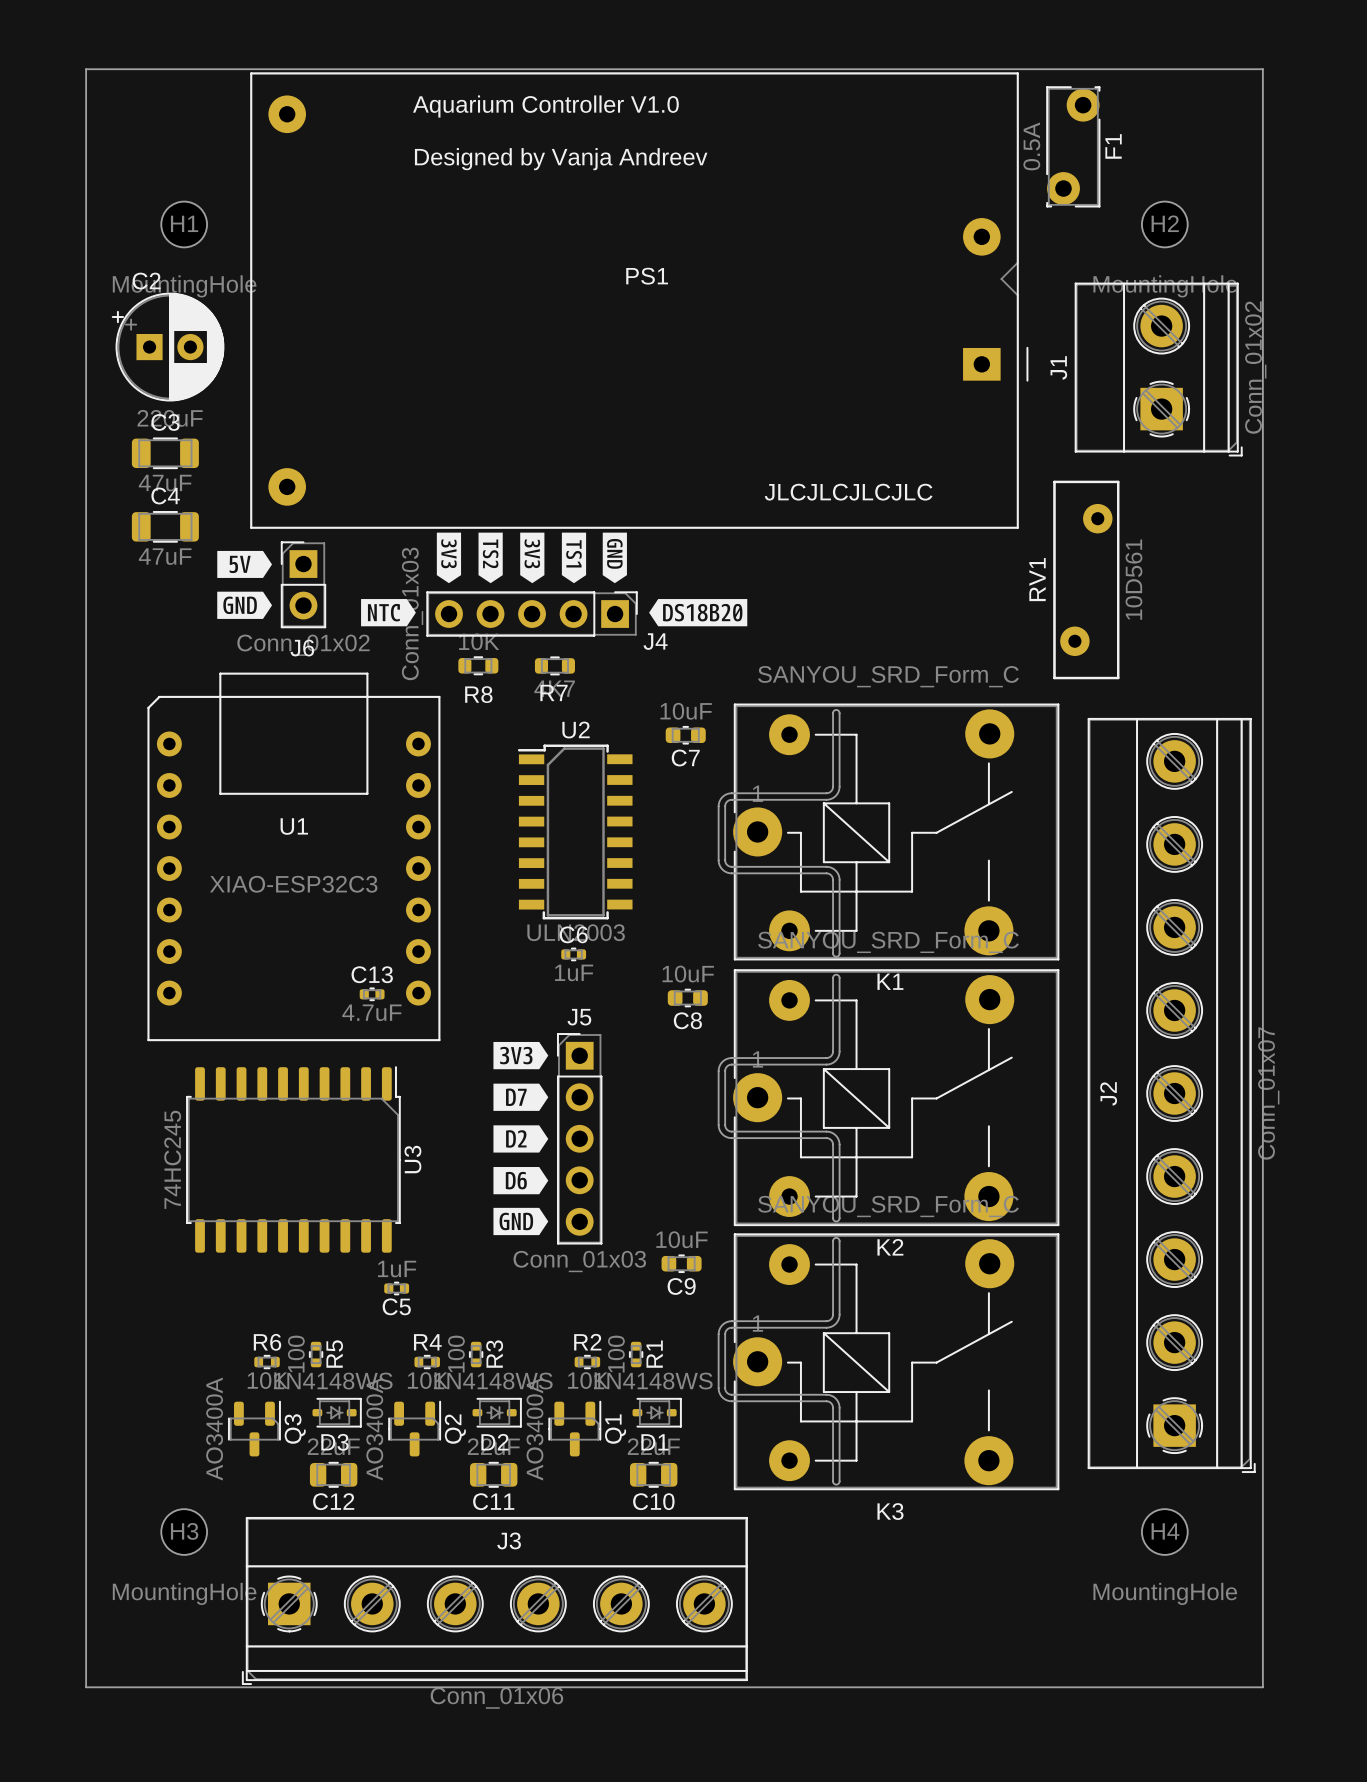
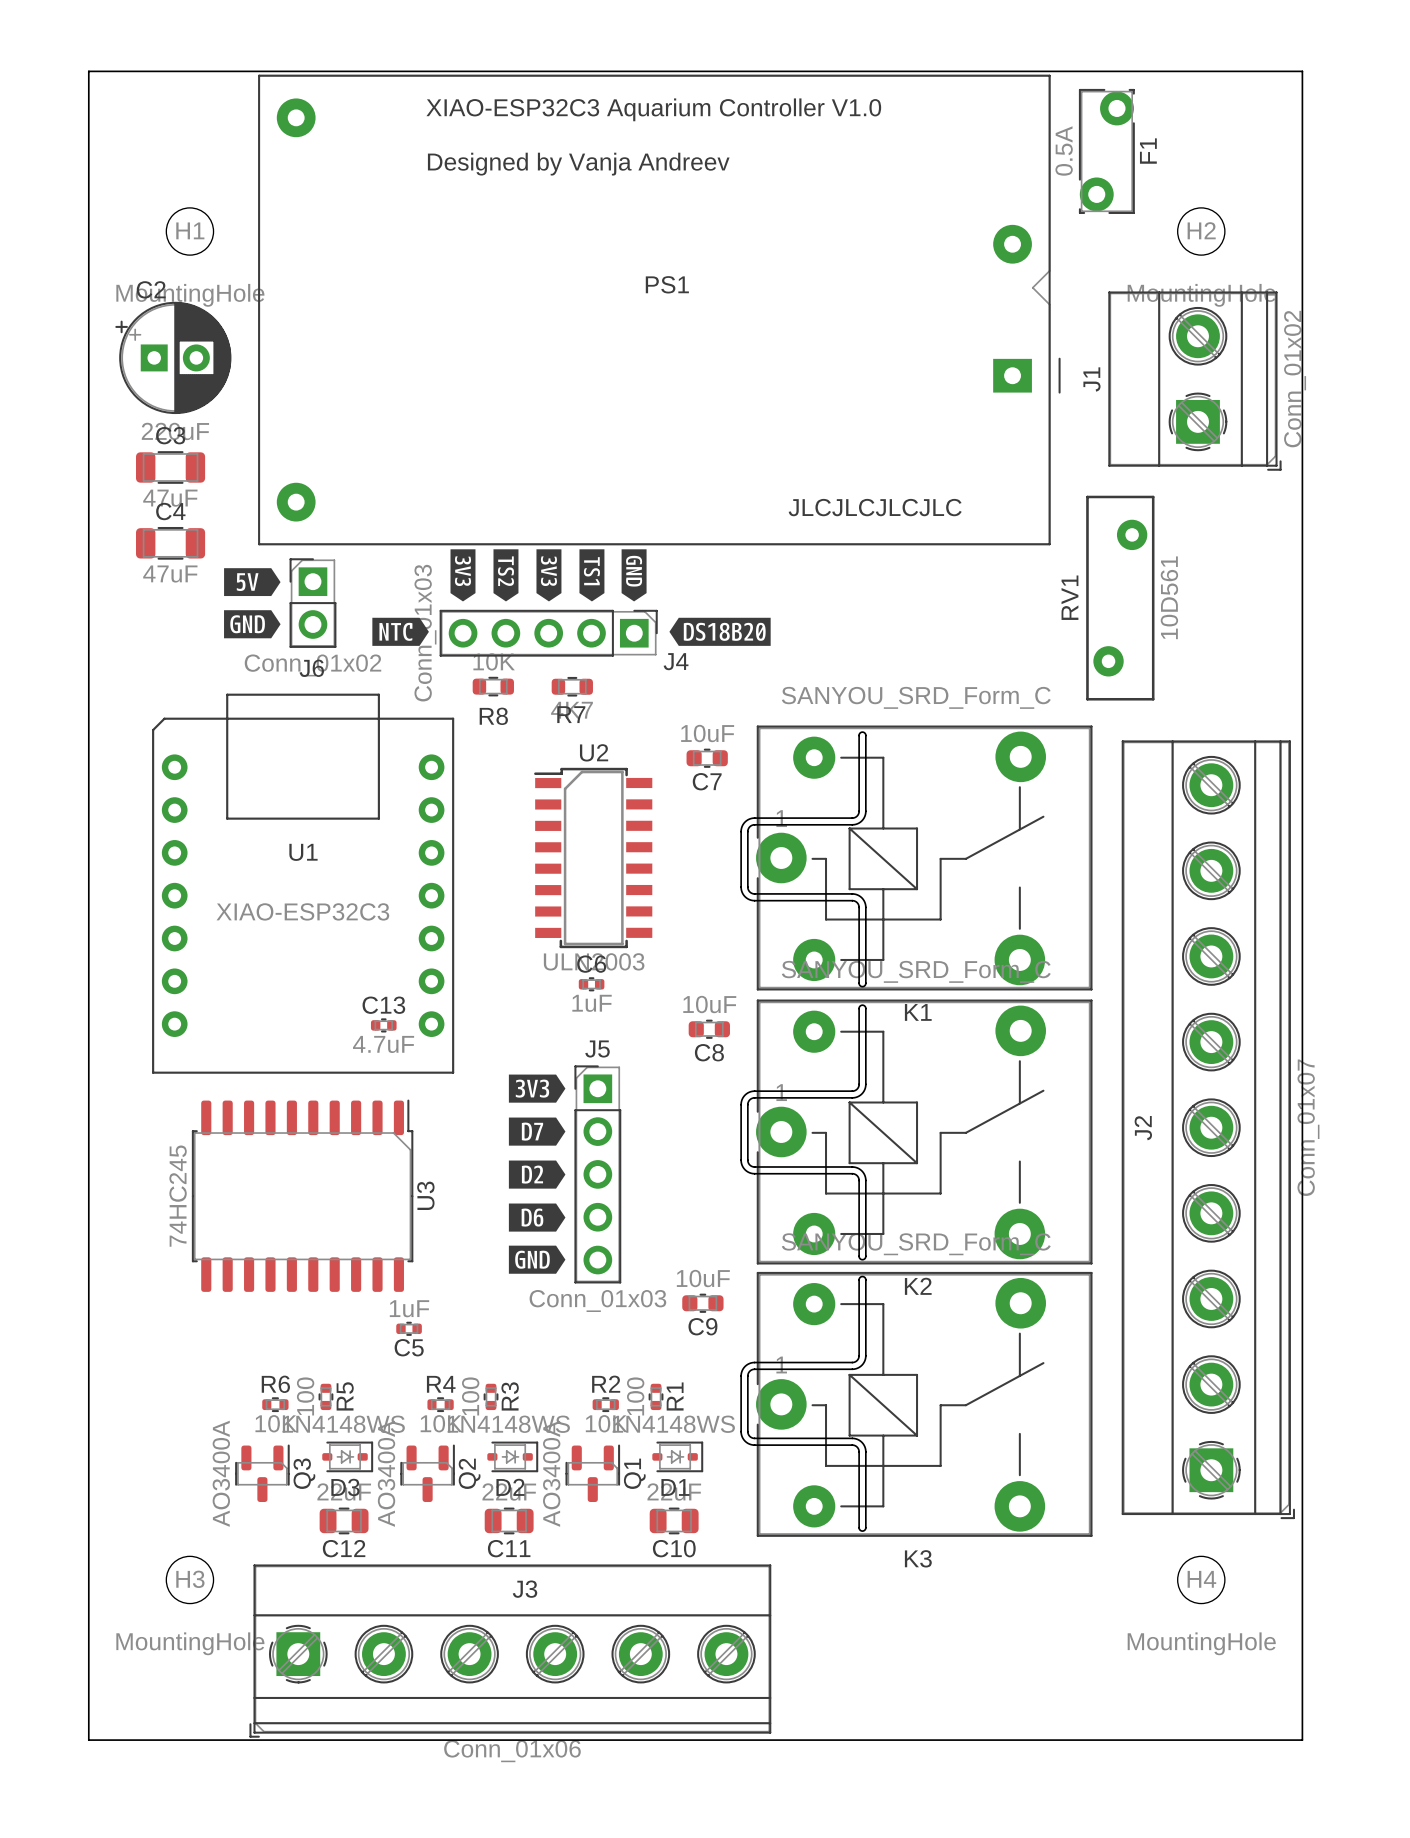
text: Aquarium Controller V1.0 (545, 106) -> XIAO-ESP32C3 Aquarium Controller V1.0 (653, 109)

